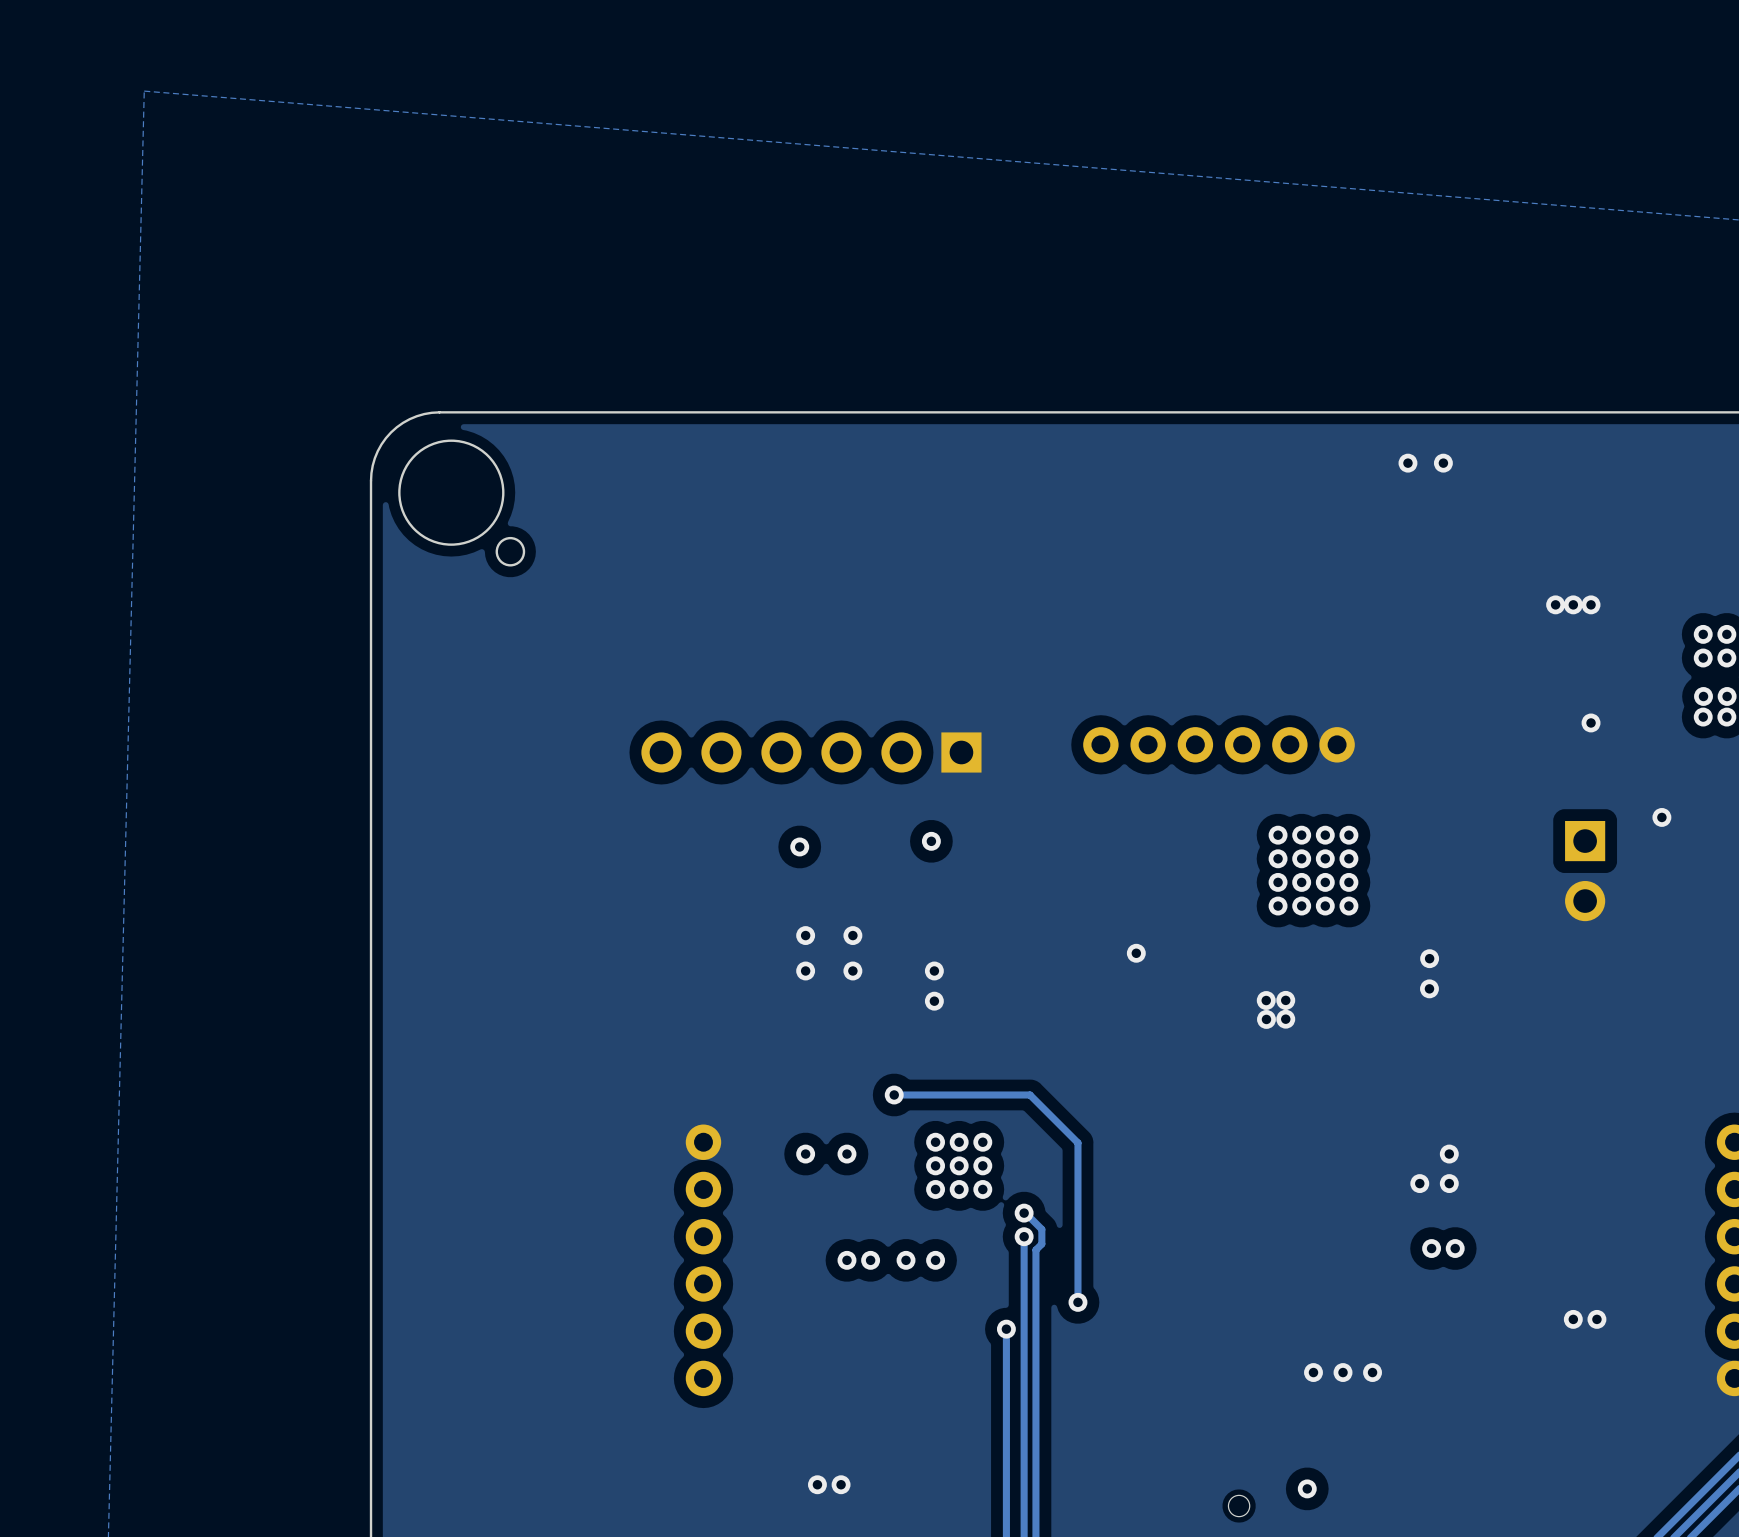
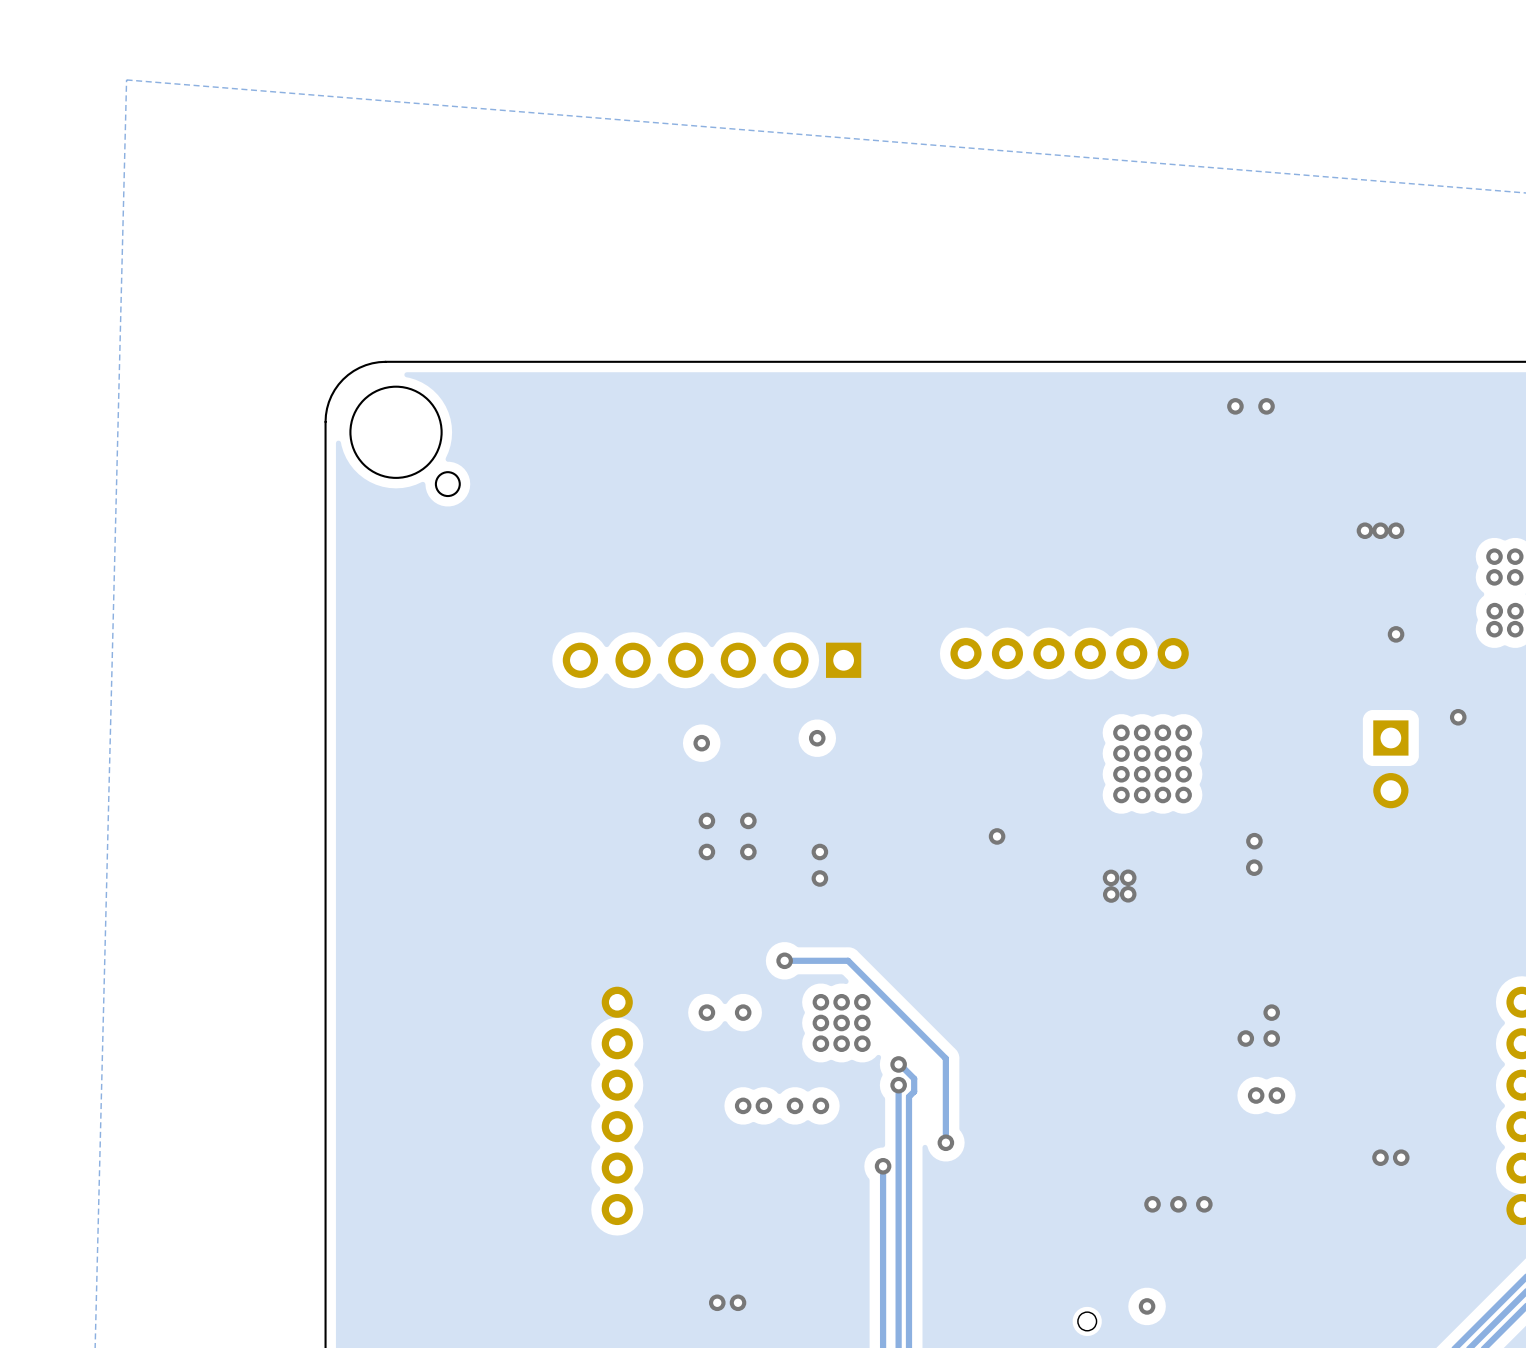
track: (966, 1094) (1030, 1094) (1077, 1142) (1077, 1206) -> (848, 960) (945, 1058)

